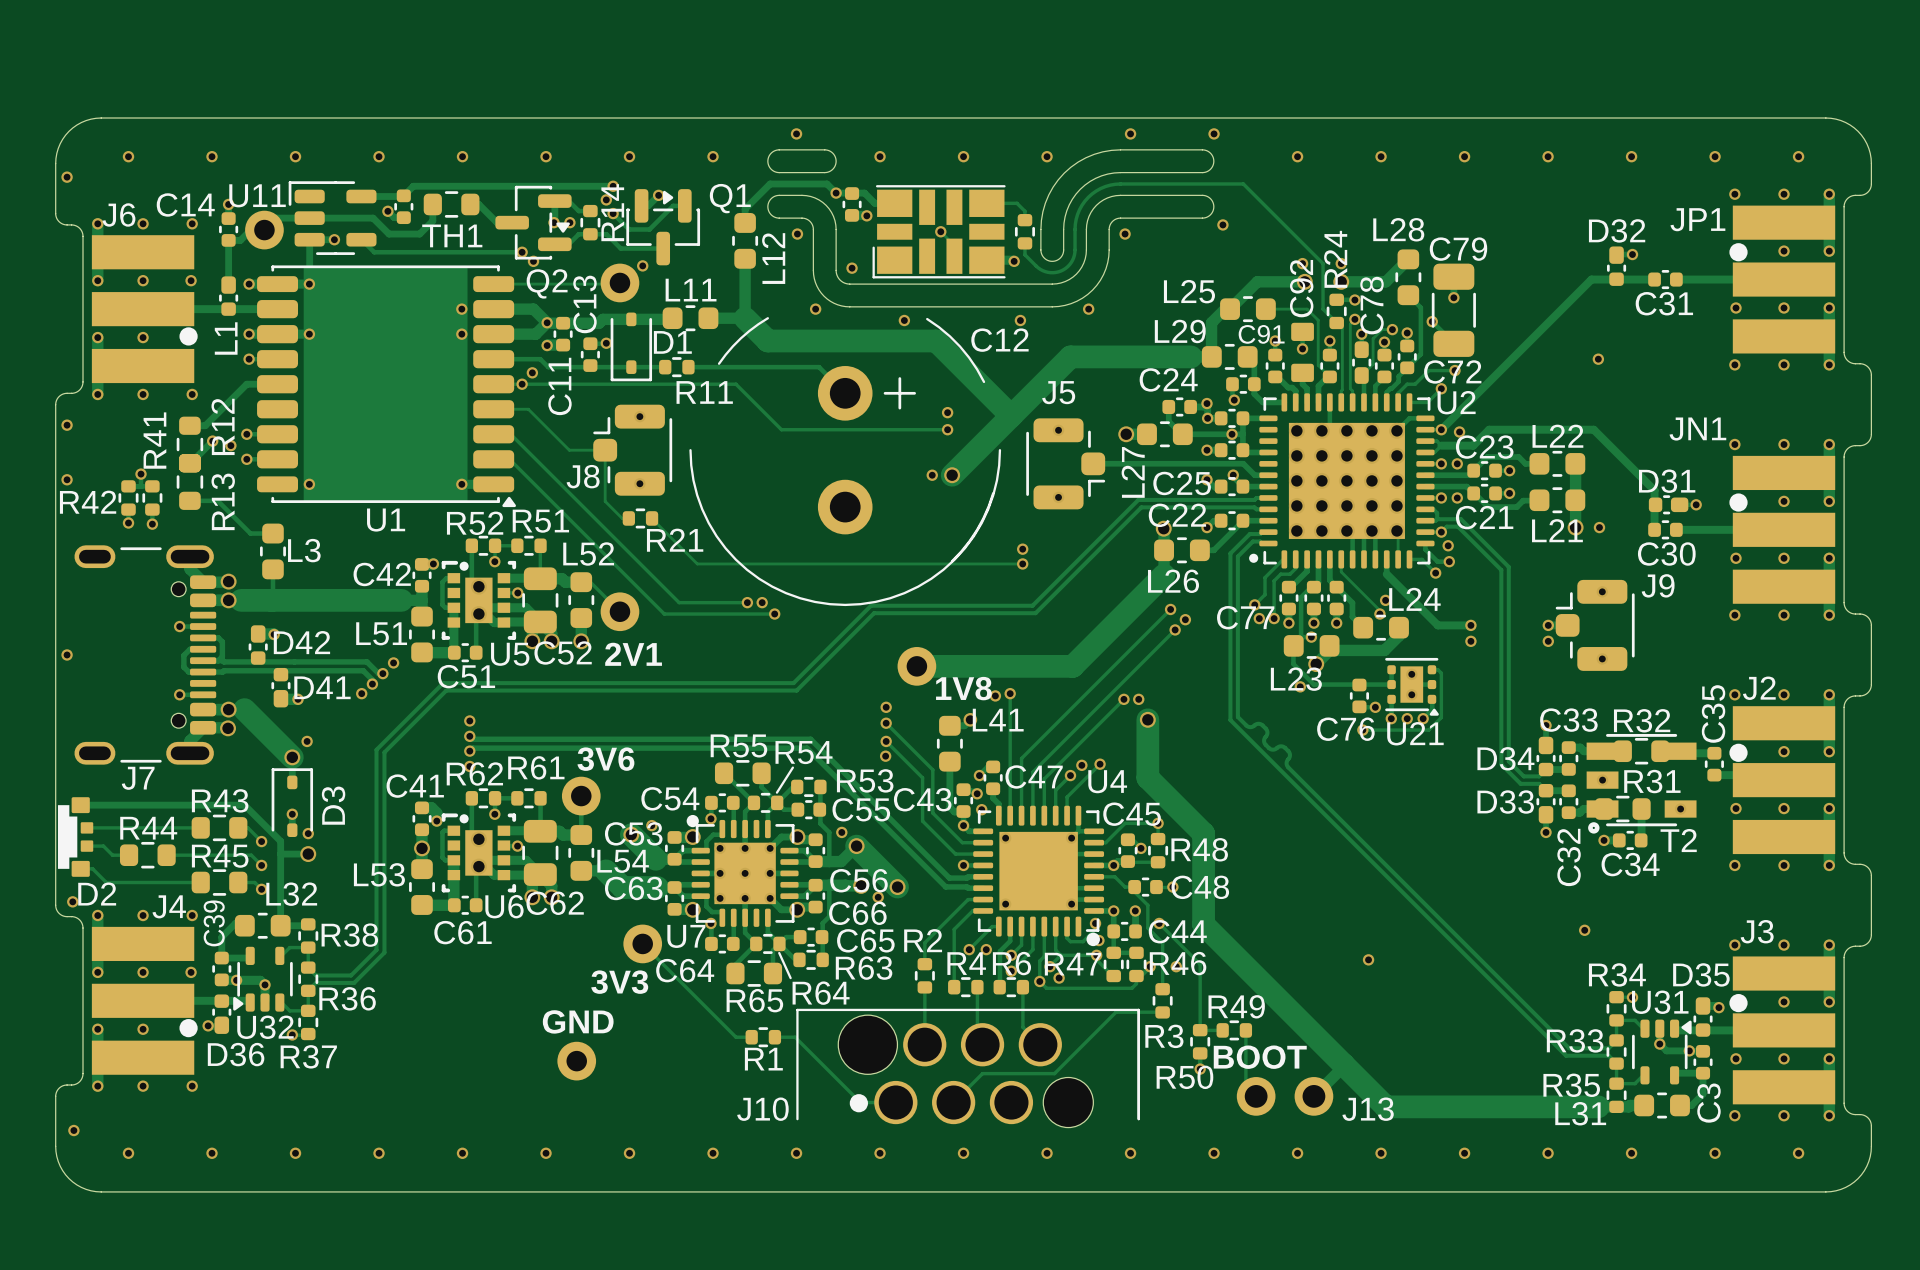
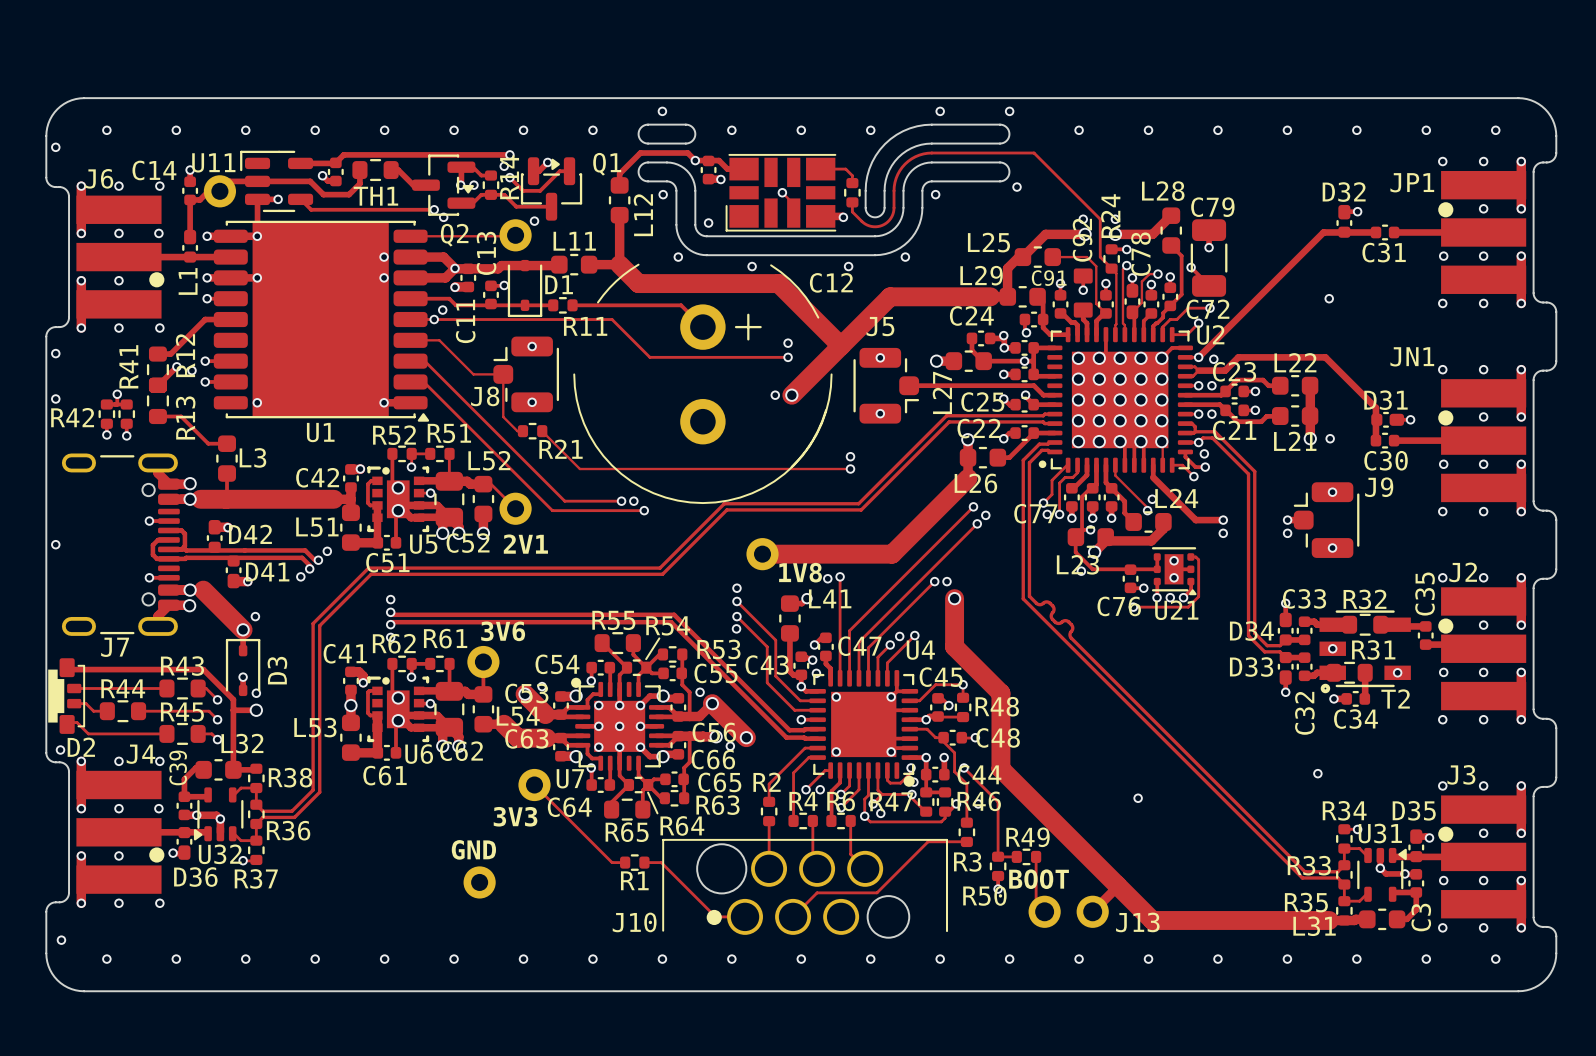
D2 footprint: [71, 797, 94, 877] -> [59, 658, 86, 734]

